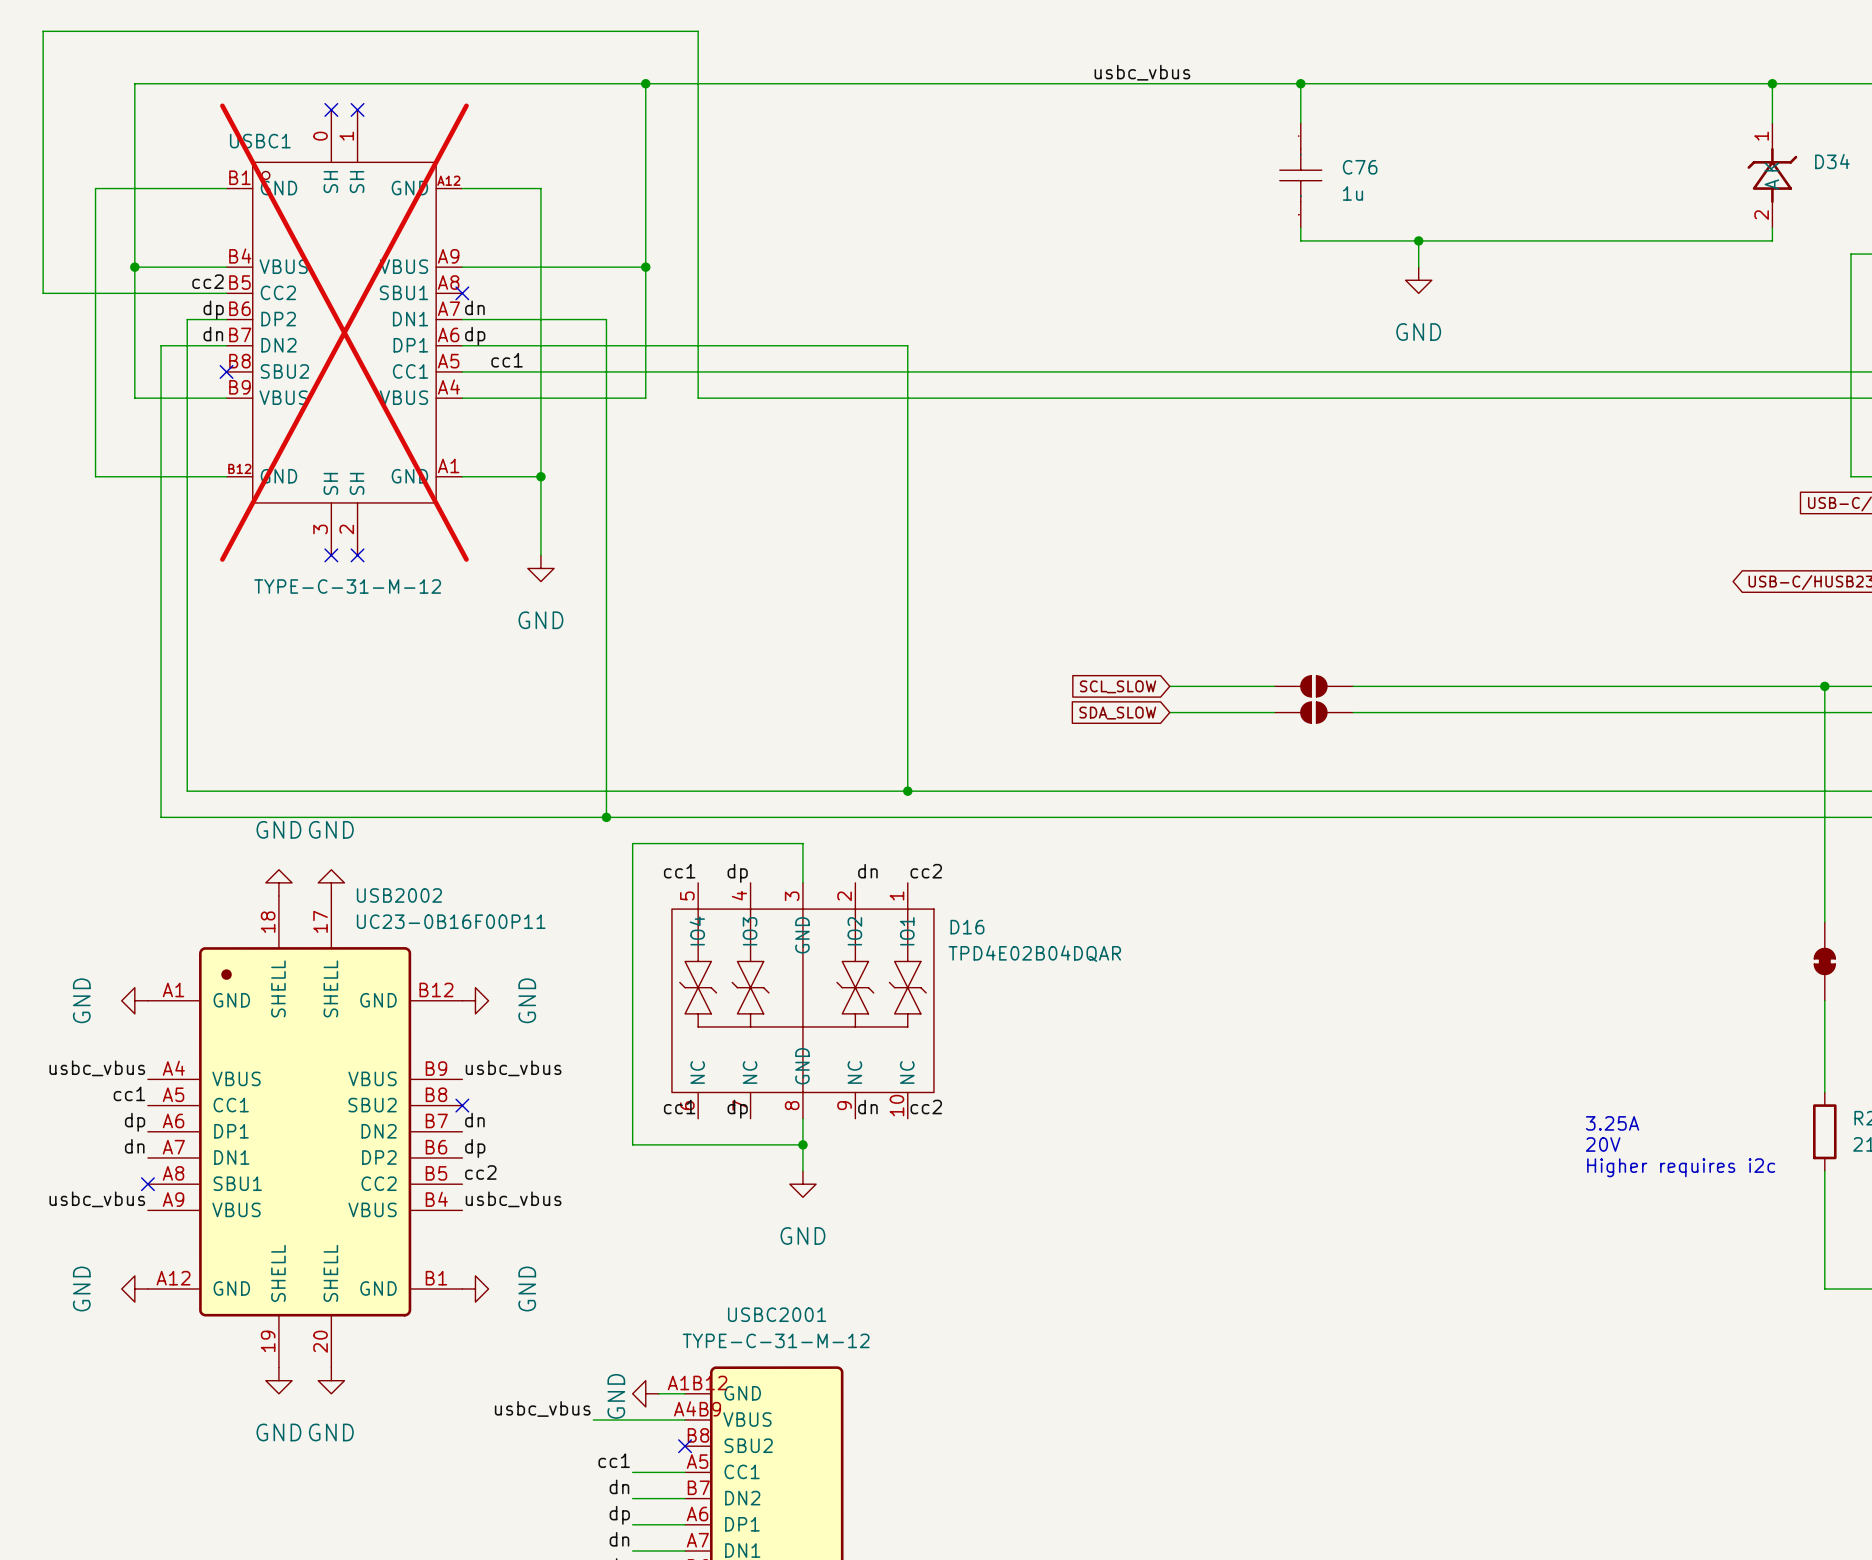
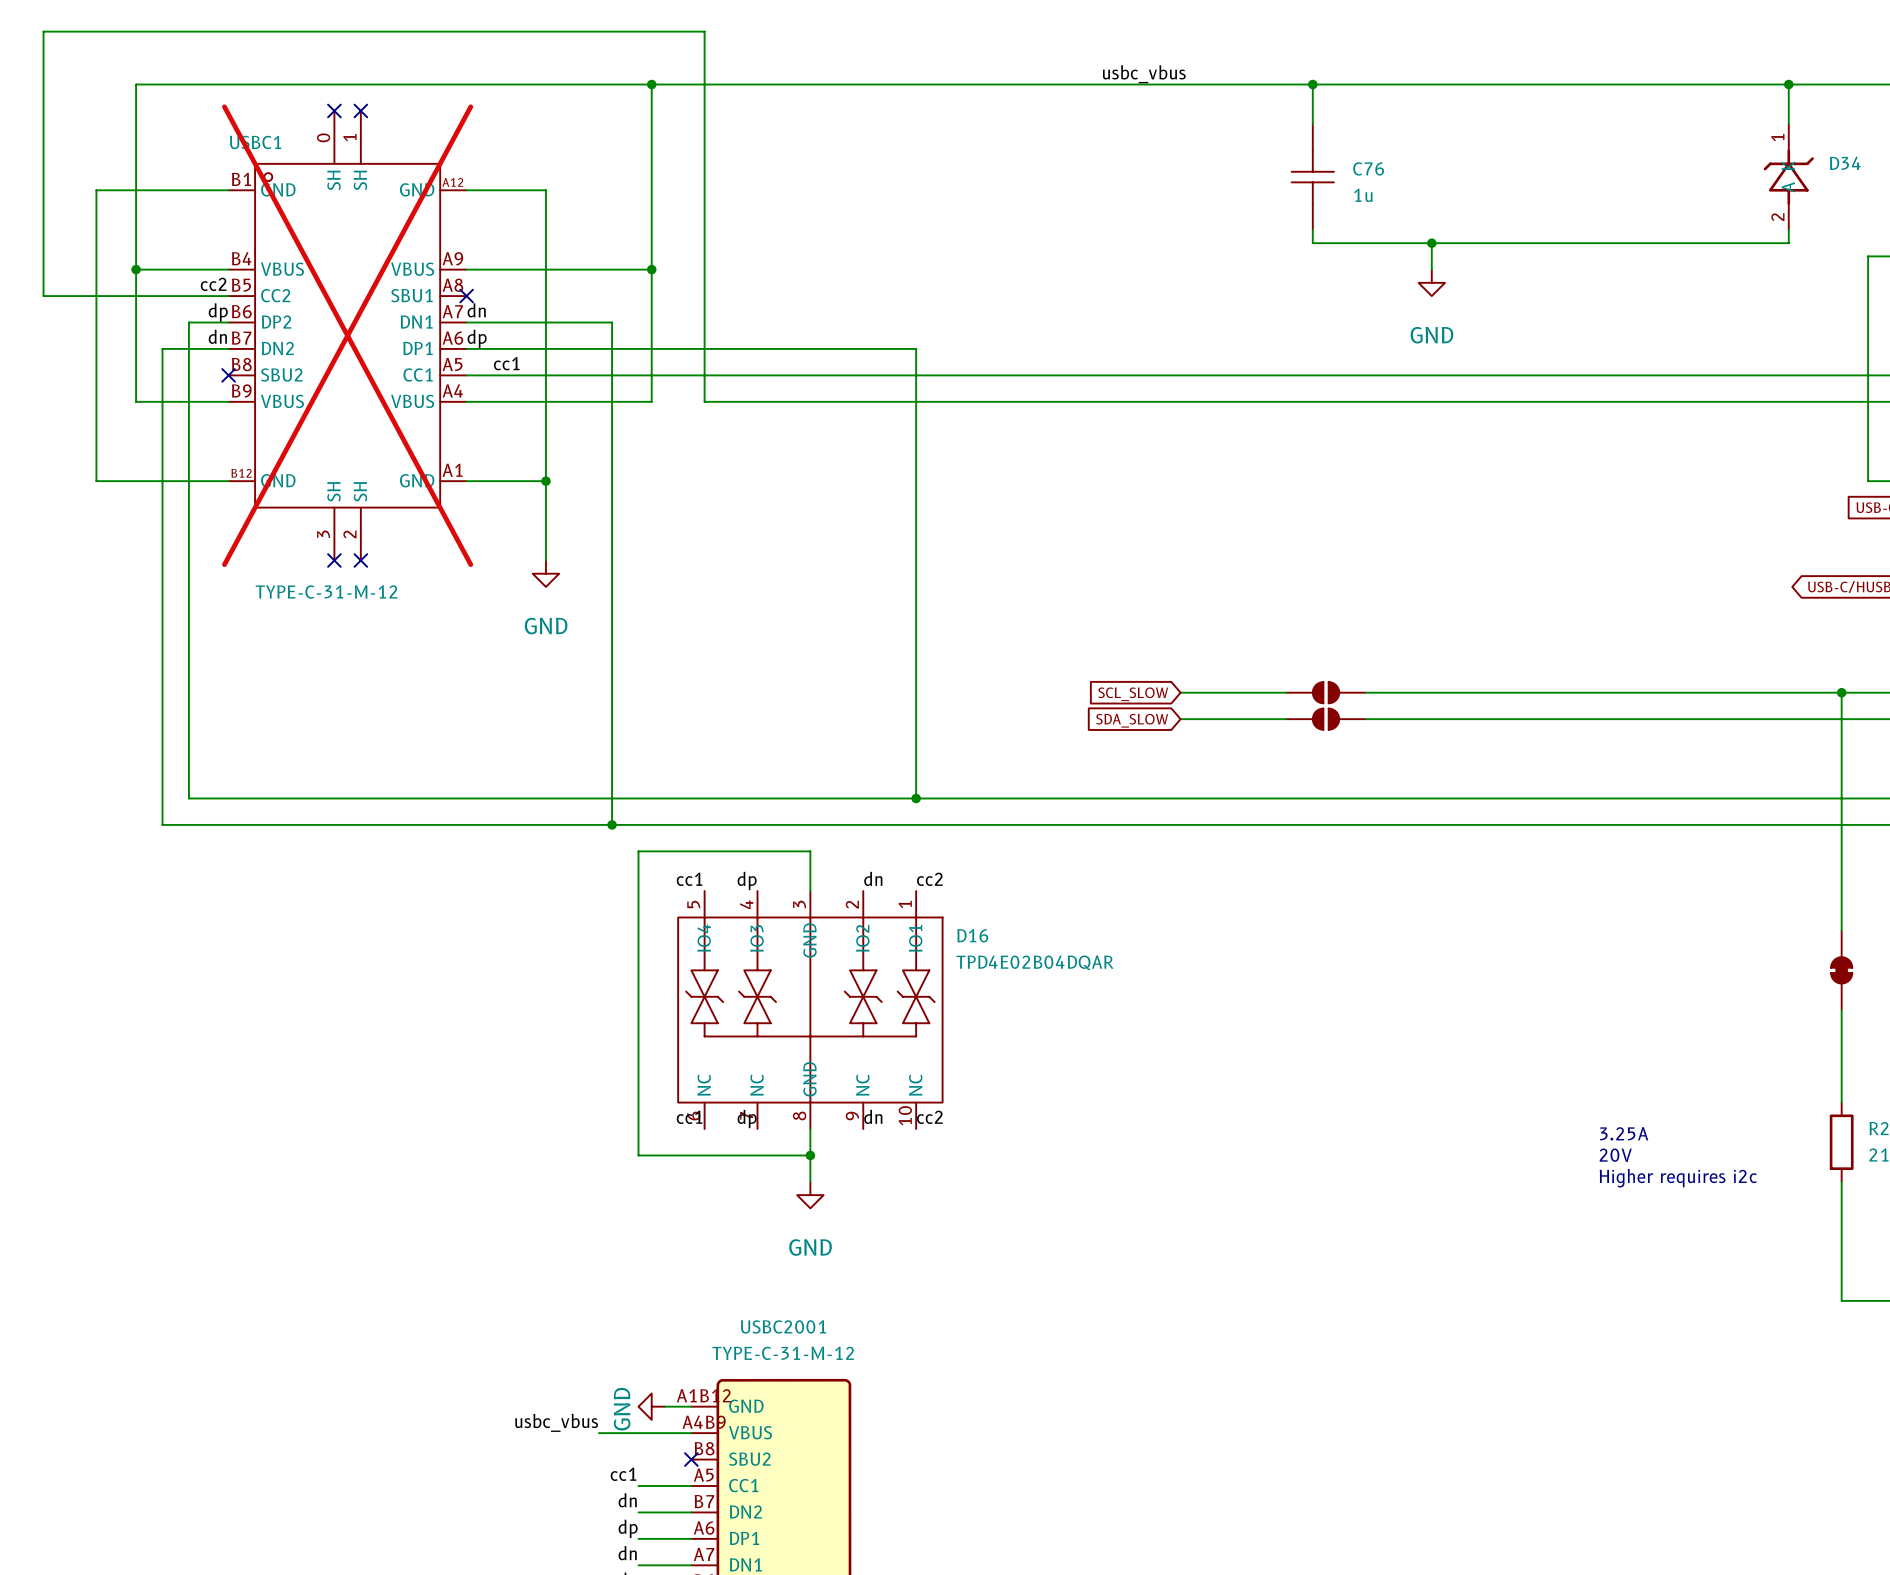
power symbol: GND (278, 882) -> none
power symbol: GND (331, 882) -> none
power symbol: GND (134, 1000) -> none
power symbol: GND (475, 1000) -> none
label: usbc_vbus (97, 1068) -> none
label: usbc_vbus (513, 1068) -> none
label: cc1 (129, 1093) -> none
no-connect mark: (462, 1105) -> none
label: dn (474, 1120) -> none
label: dp (135, 1122) -> none
USB2002: UC23-0B16F00P11 (305, 1131) -> none
label: dn (134, 1146) -> none
label: dp (475, 1148) -> none
label: cc2 (480, 1172) -> none
no-connect mark: (147, 1184) -> none
label: usbc_vbus (97, 1199) -> none
label: usbc_vbus (513, 1199) -> none
power symbol: GND (134, 1288) -> none
power symbol: GND (475, 1288) -> none
power symbol: GND (278, 1380) -> none
power symbol: GND (331, 1380) -> none

